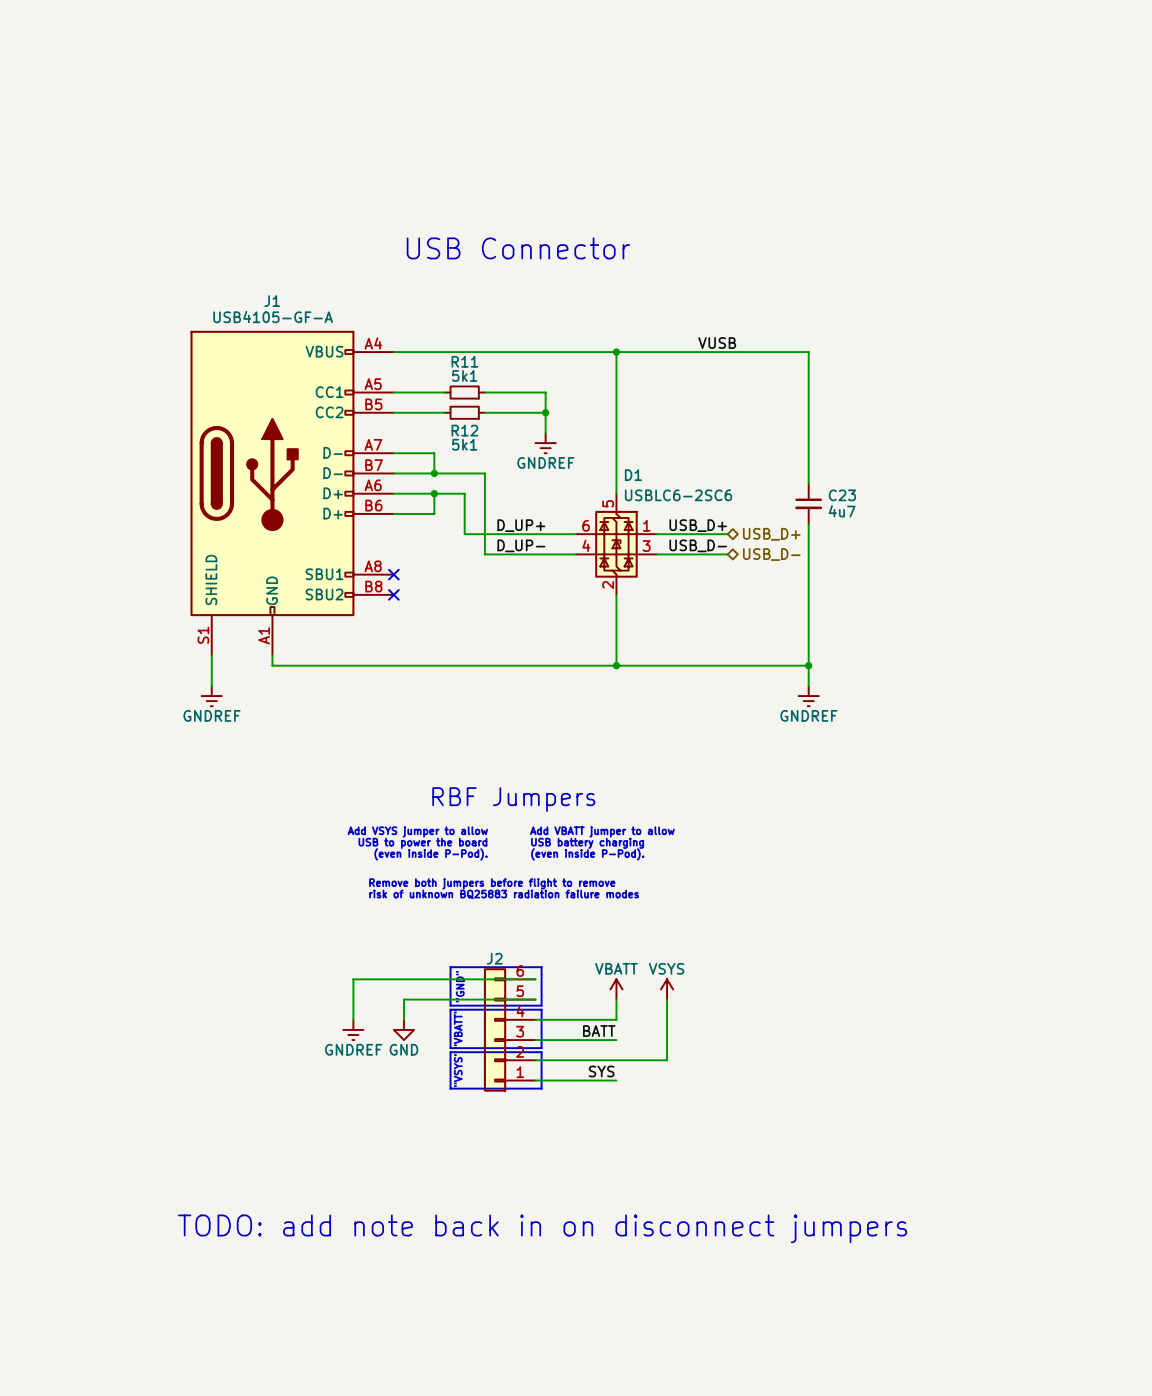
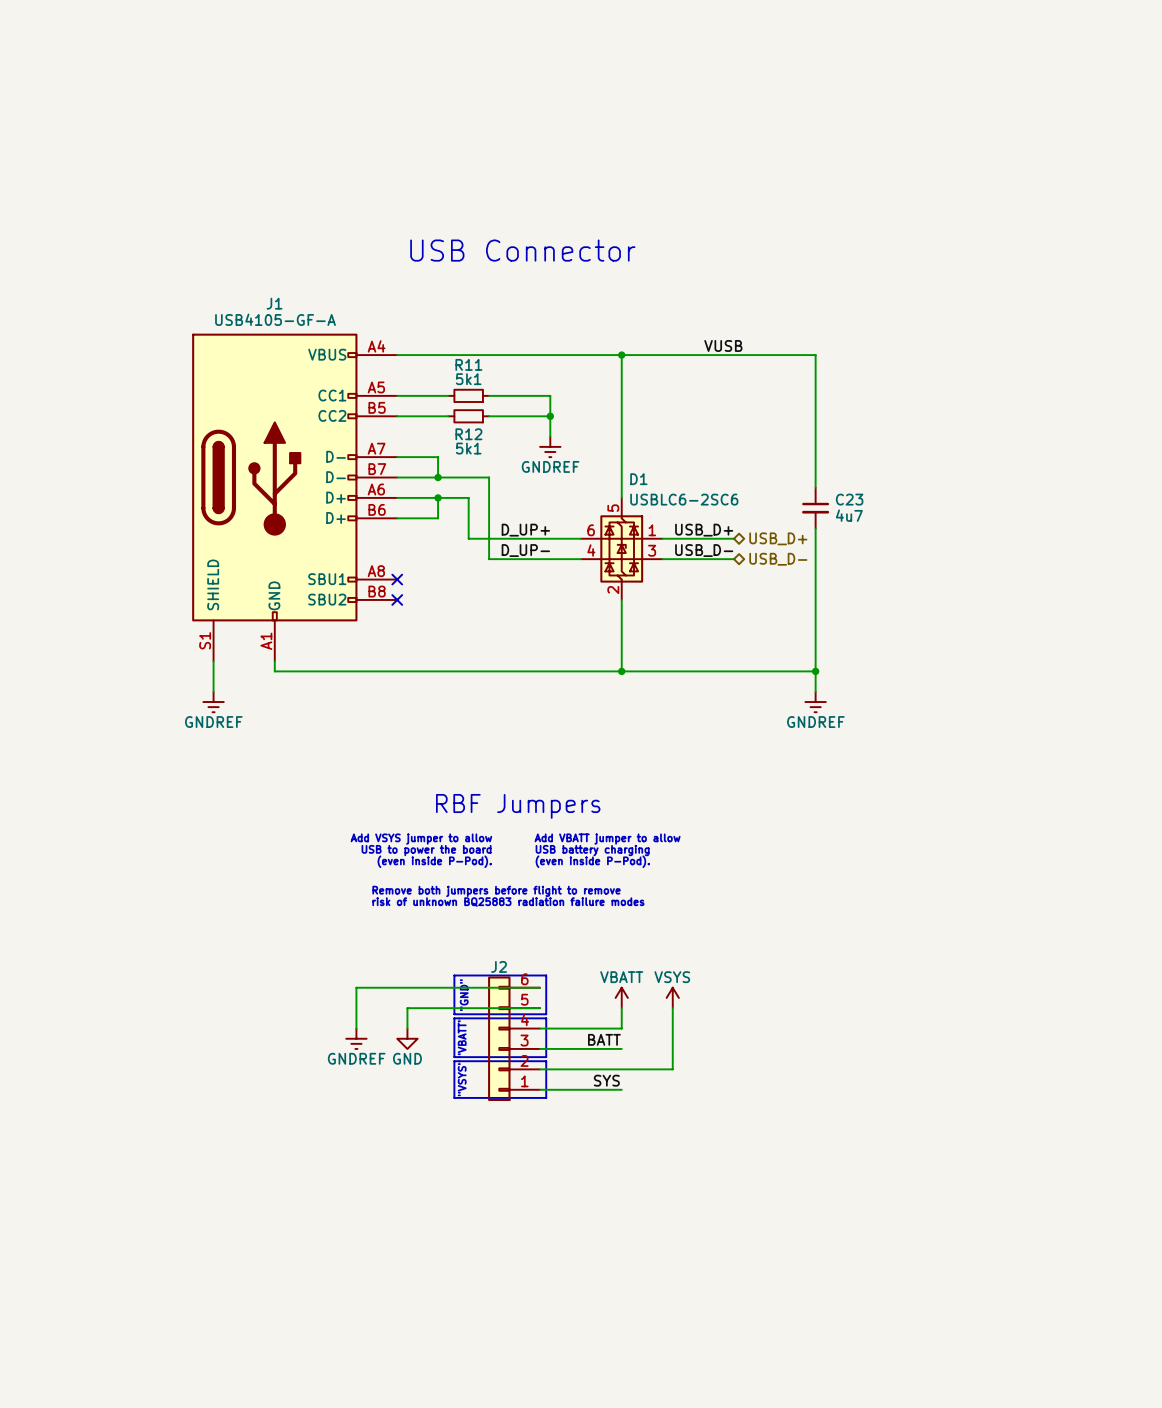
text: TODO: add note back in on disconnect jumpers (542, 1228) -> none

